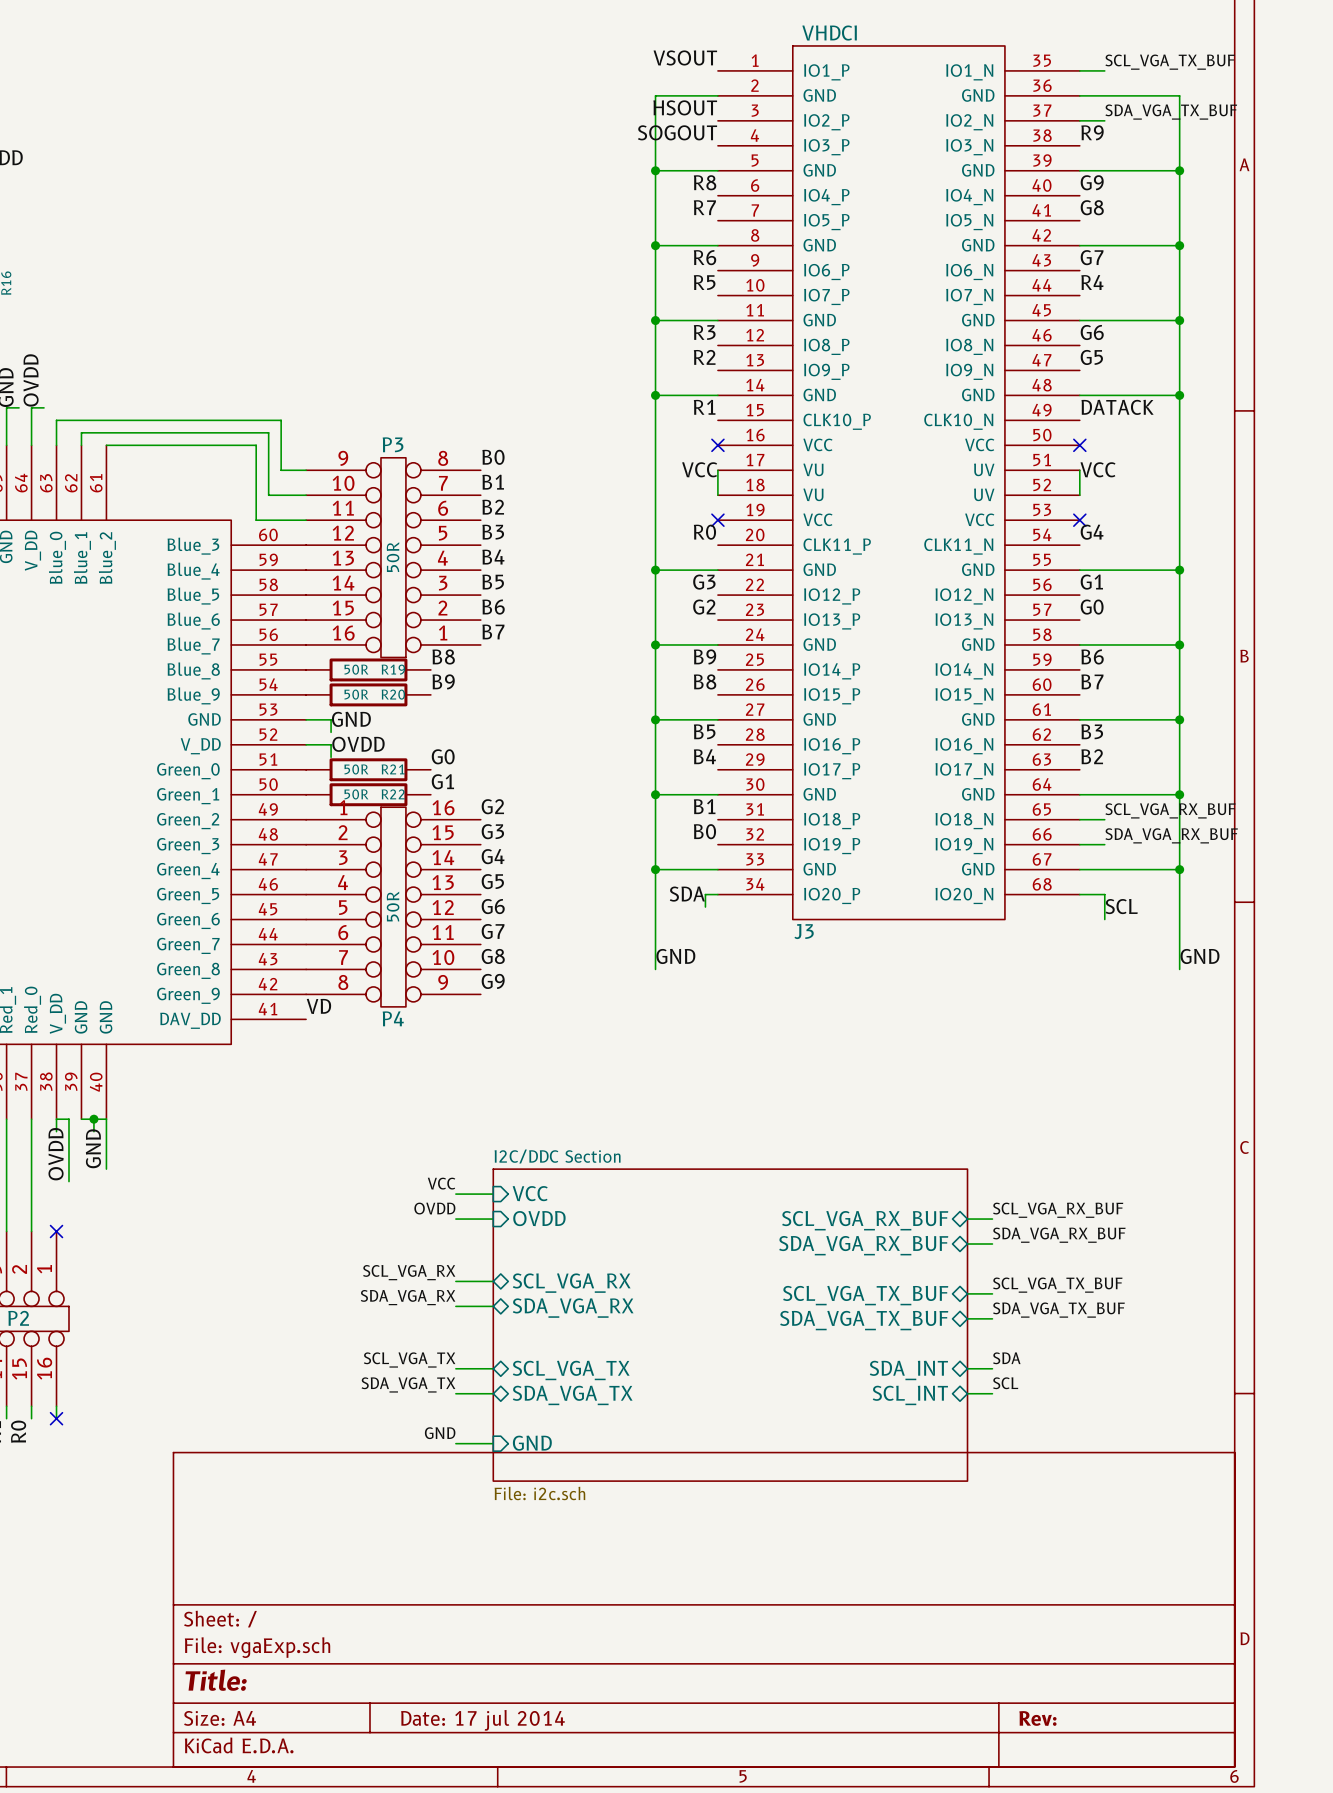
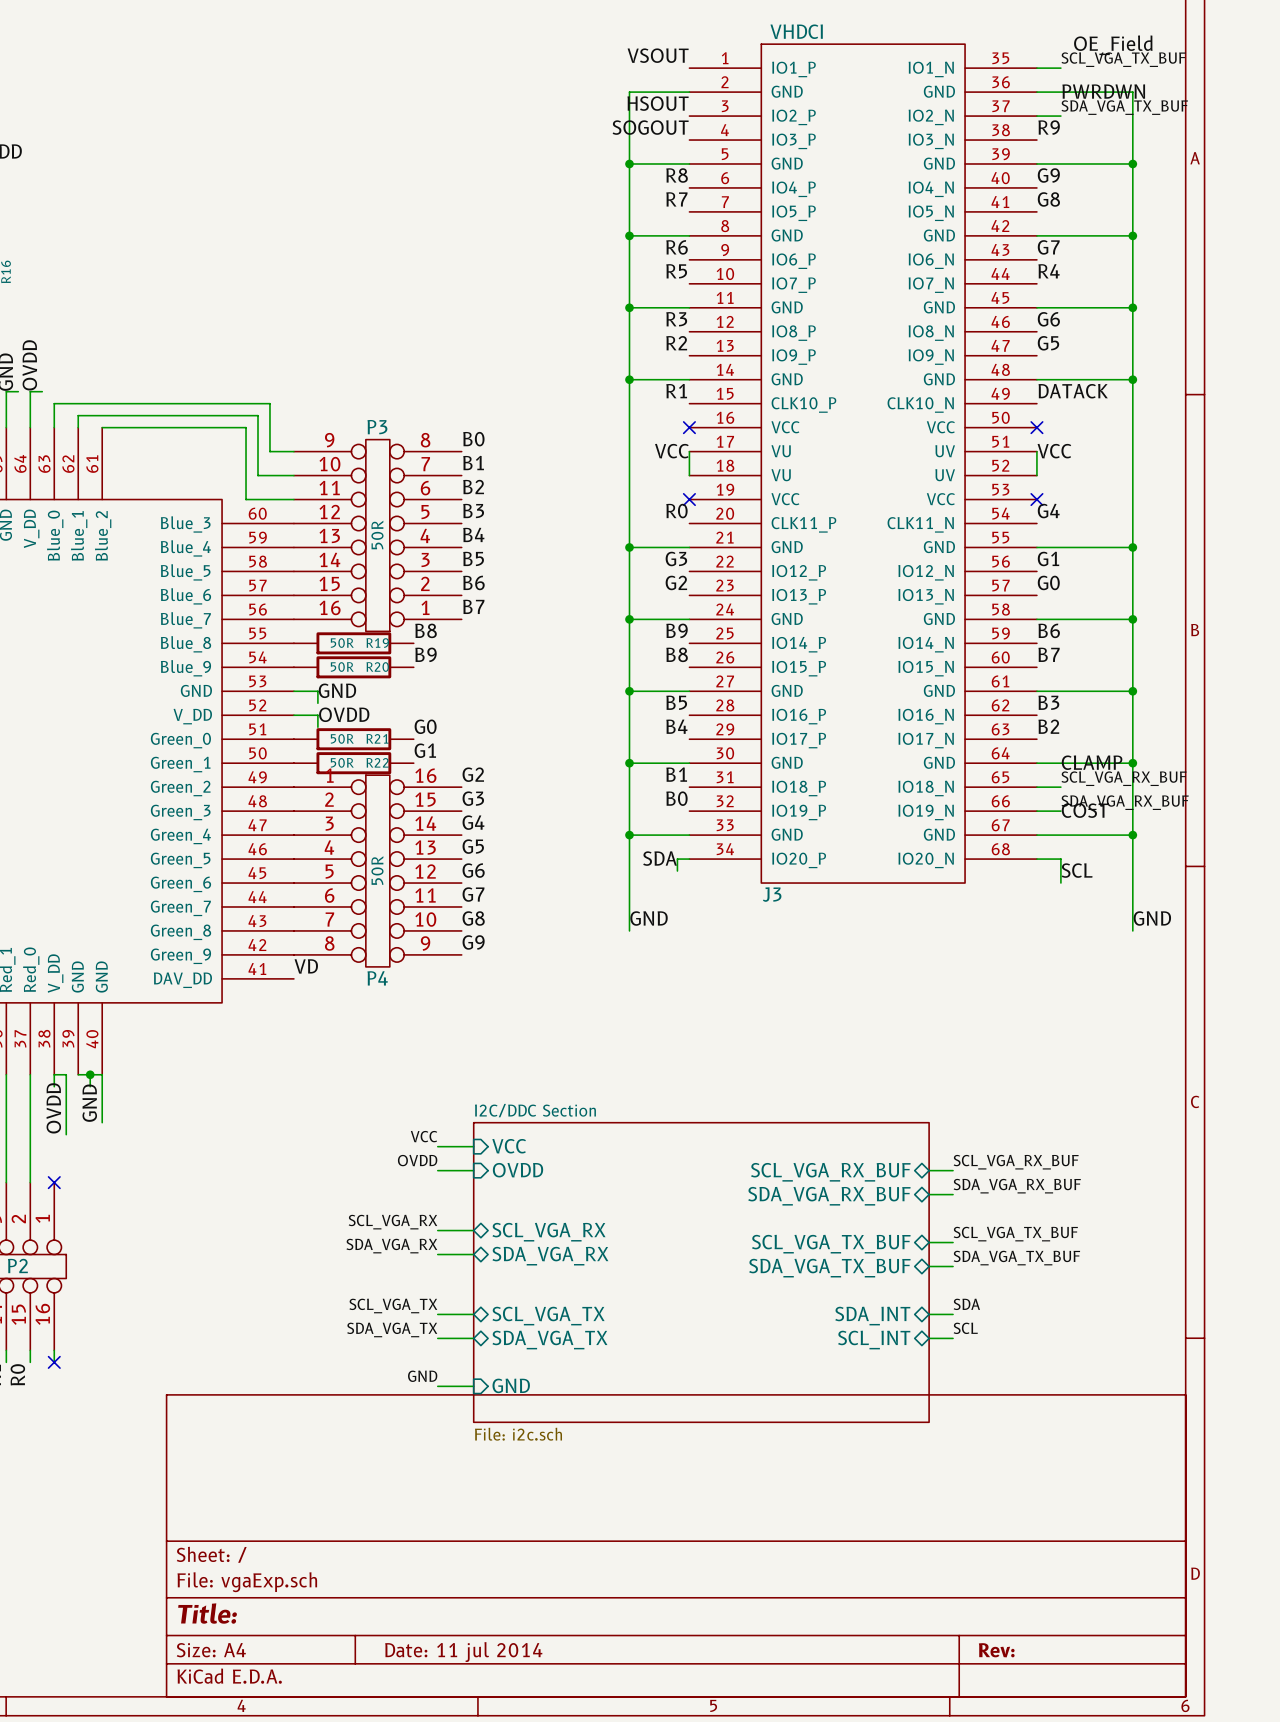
label: none -> OE_Field (1113, 45)
label: none -> PWRDWN (1103, 91)
label: none -> CLAMP (1092, 762)
label: none -> COST (1085, 810)
title block: Date: 17 jul 2014 (482, 1720) -> Date: 11 jul 2014 (463, 1652)

